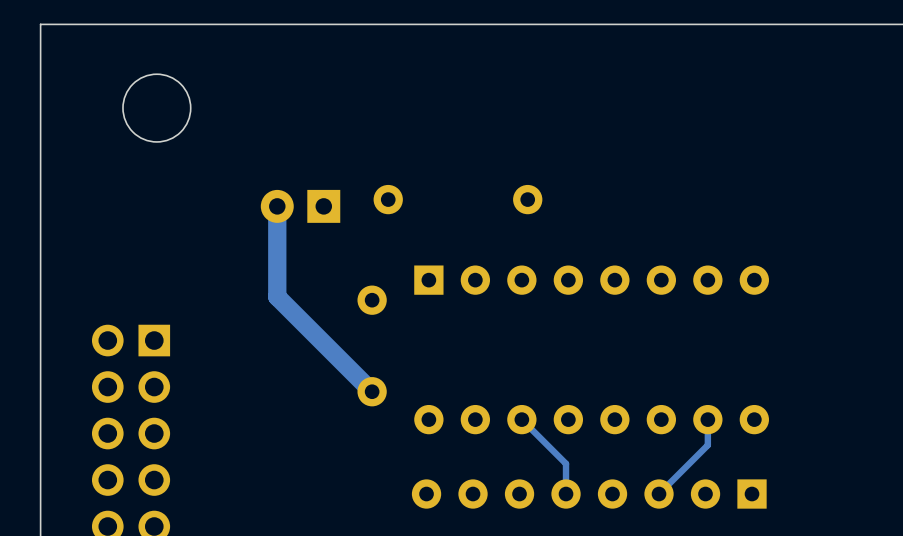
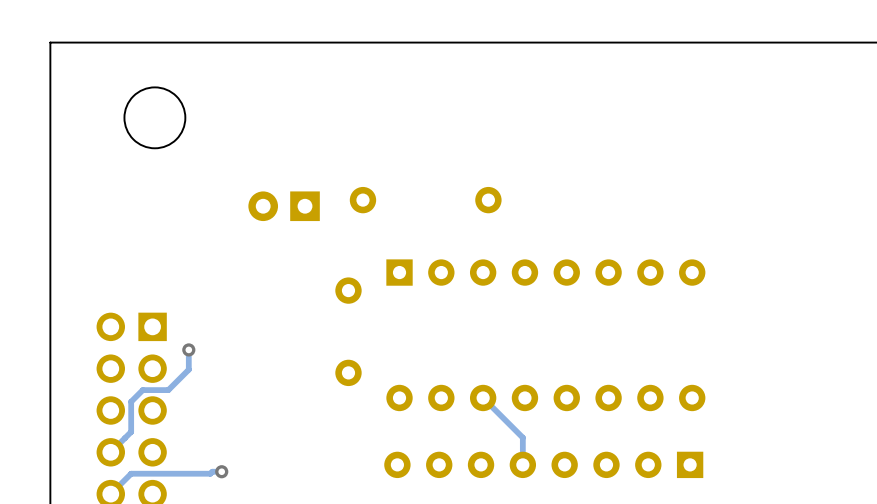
track: (277, 206) (277, 296) (372, 391) -> none
track: none -> (188, 349) (188, 369) (168, 390) (142, 390) (131, 401) (131, 431) (110, 452)
via: none -> (188, 349)
track: (707, 419) (707, 445) (659, 494) -> none
track: none -> (221, 471) (212, 471) (210, 473) (131, 473) (110, 494)
via: none -> (221, 471)

